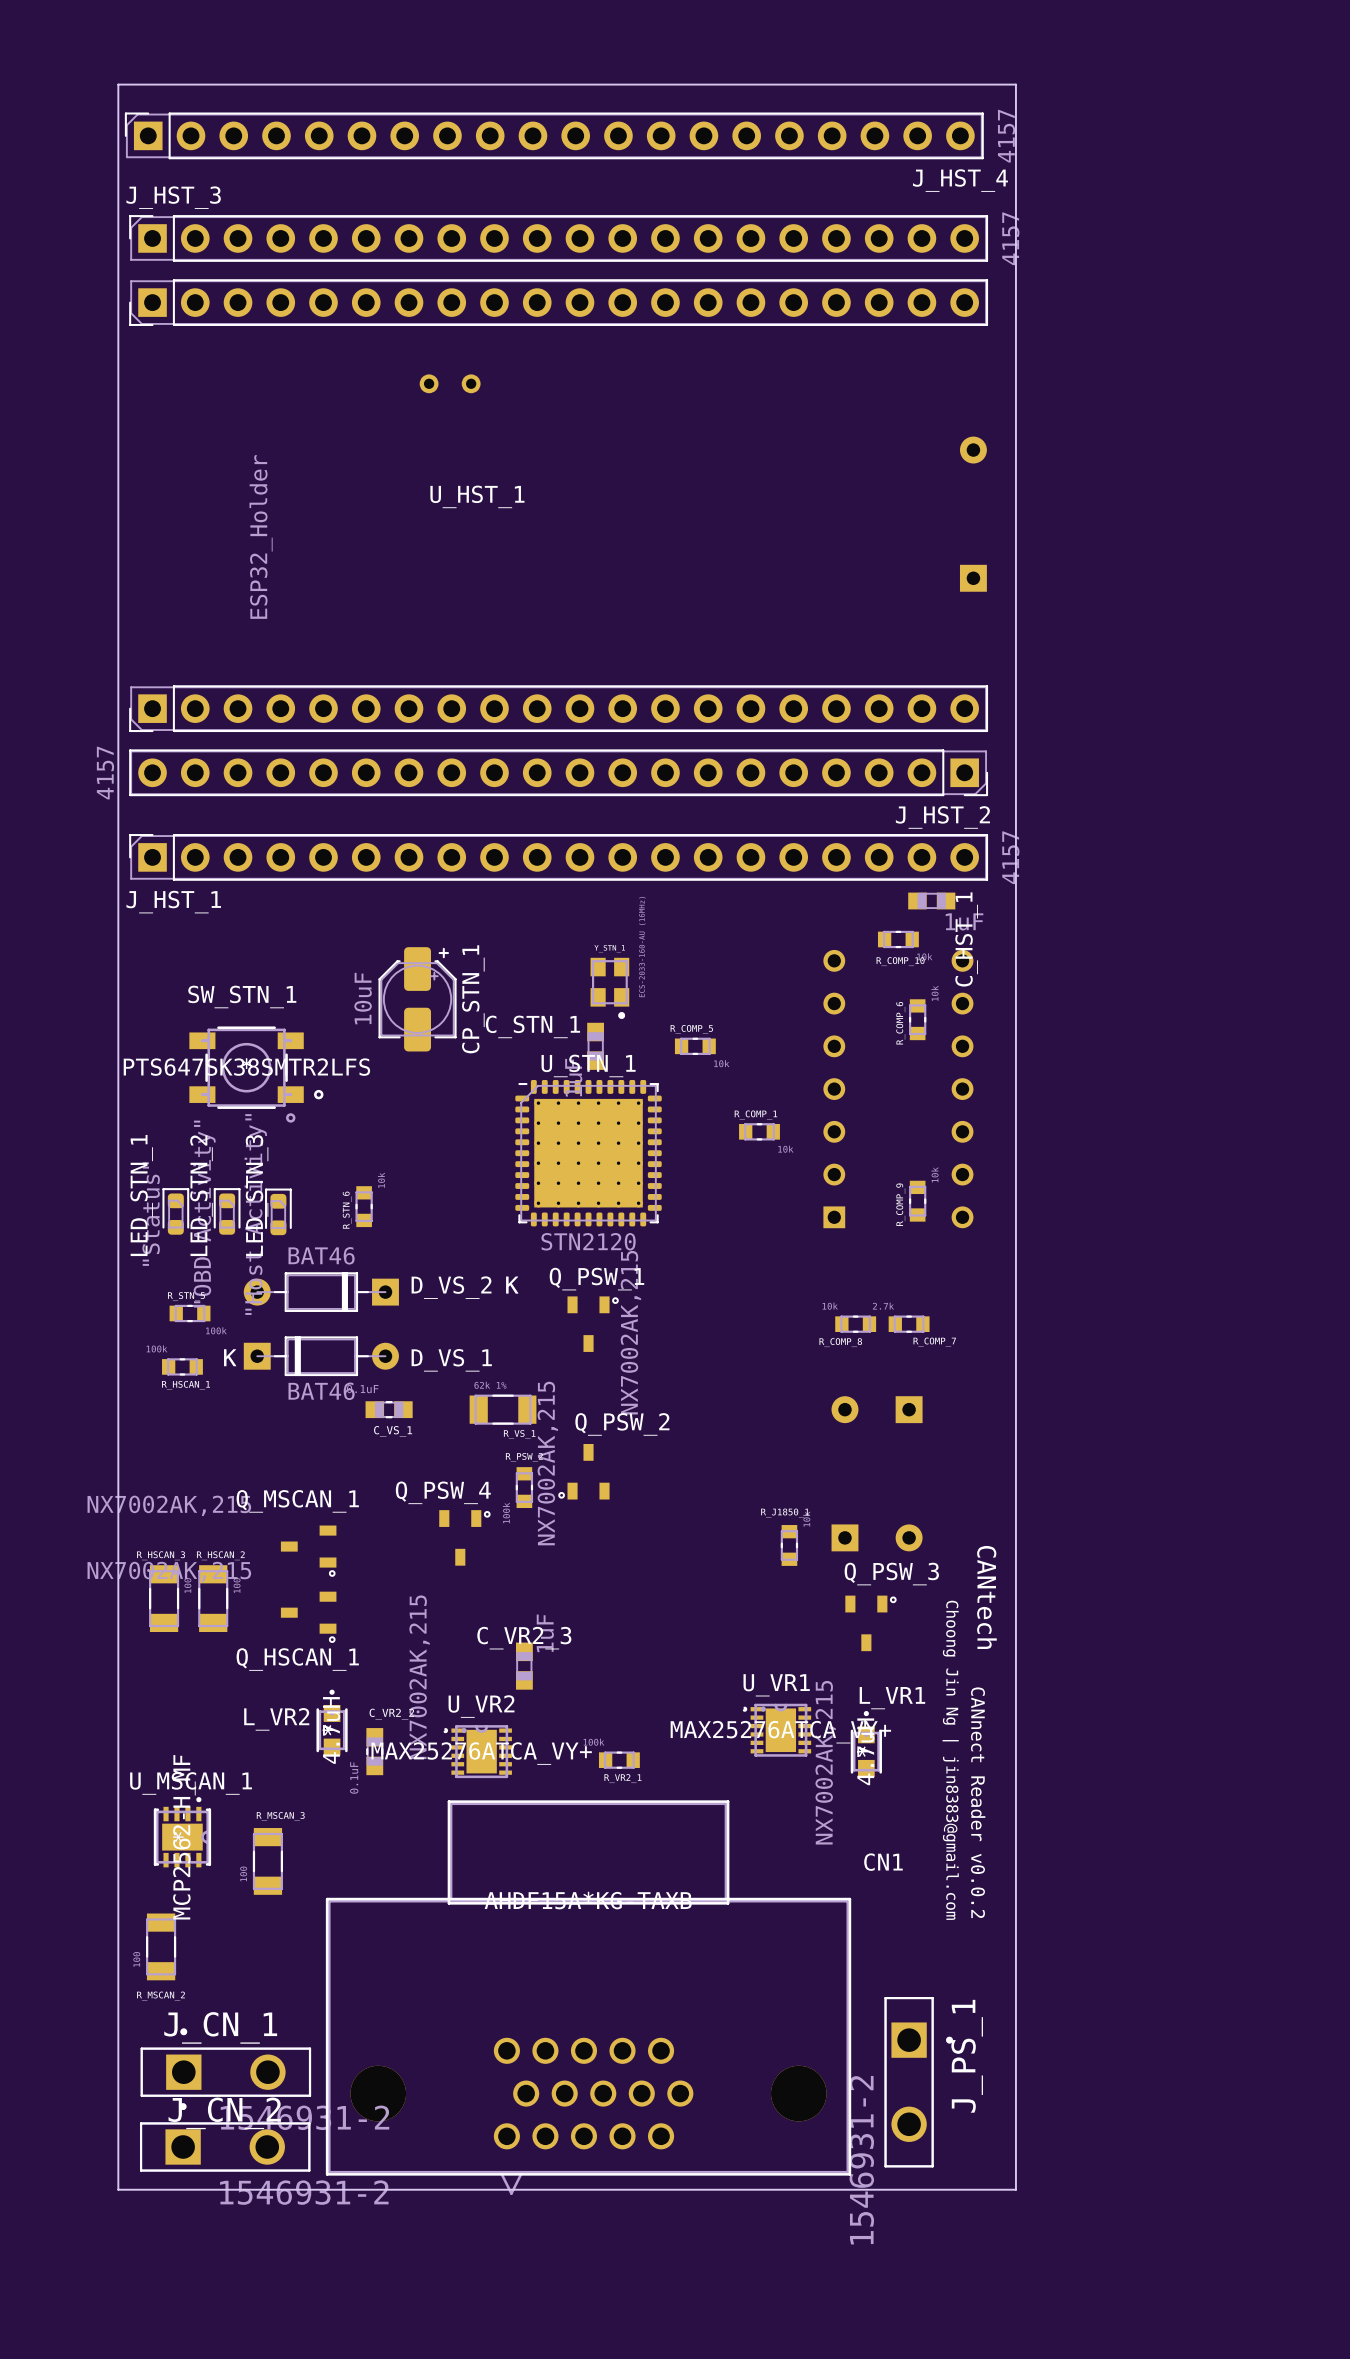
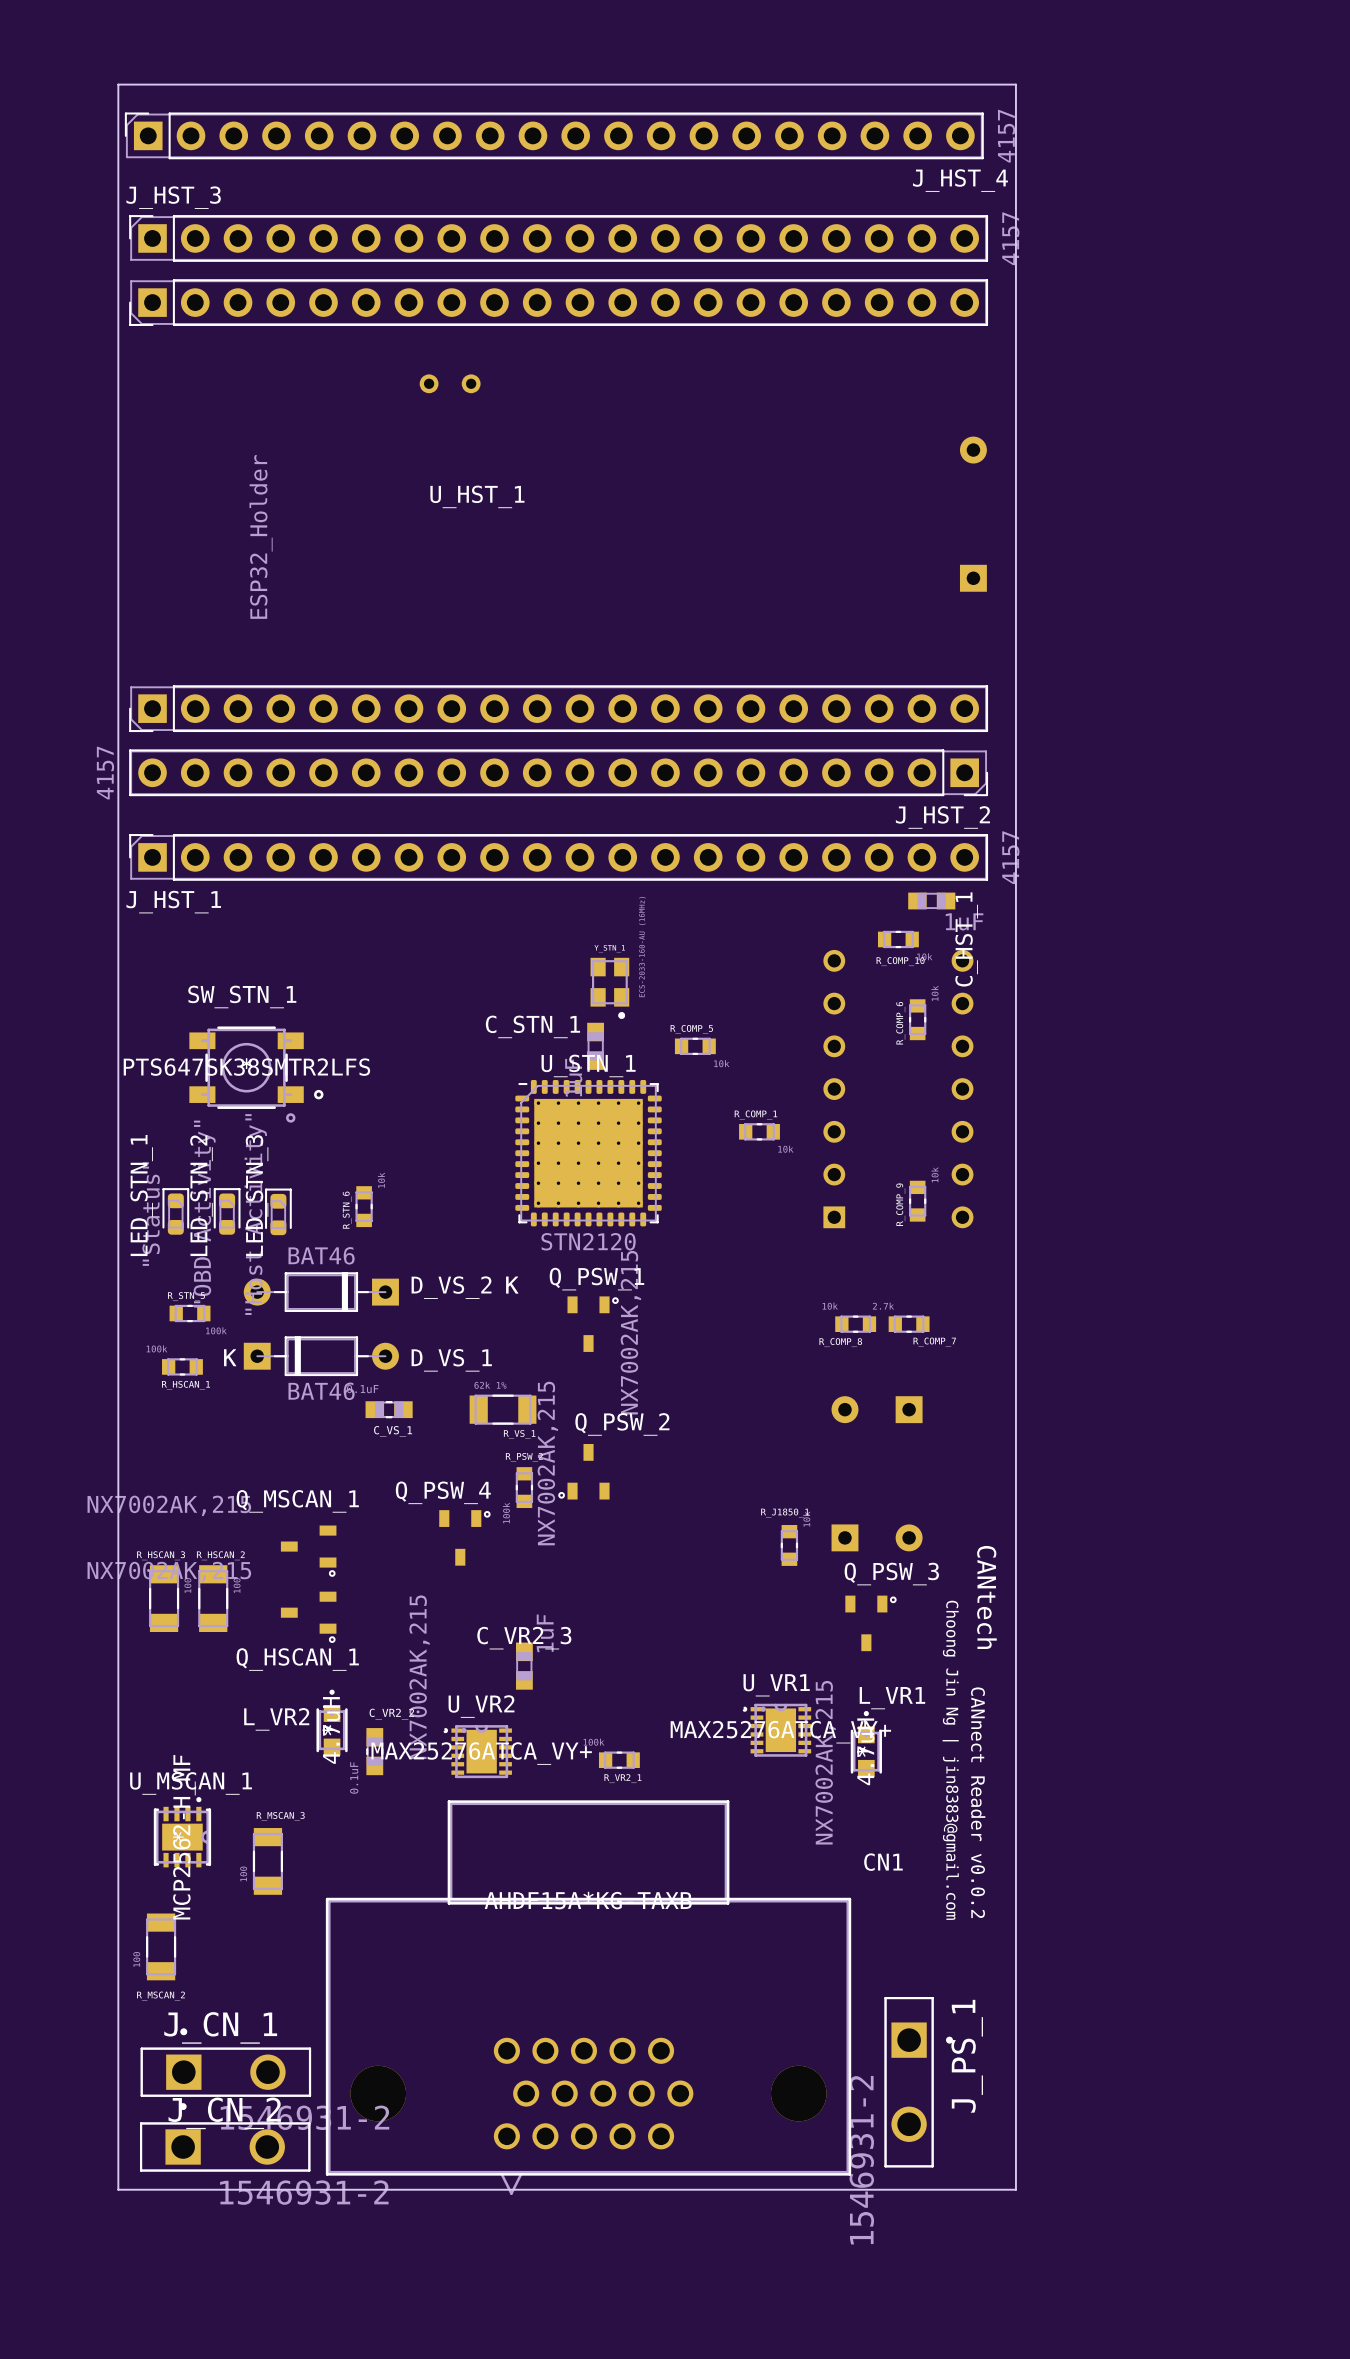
CP_STN_1: 10uF (417, 999) -> none

